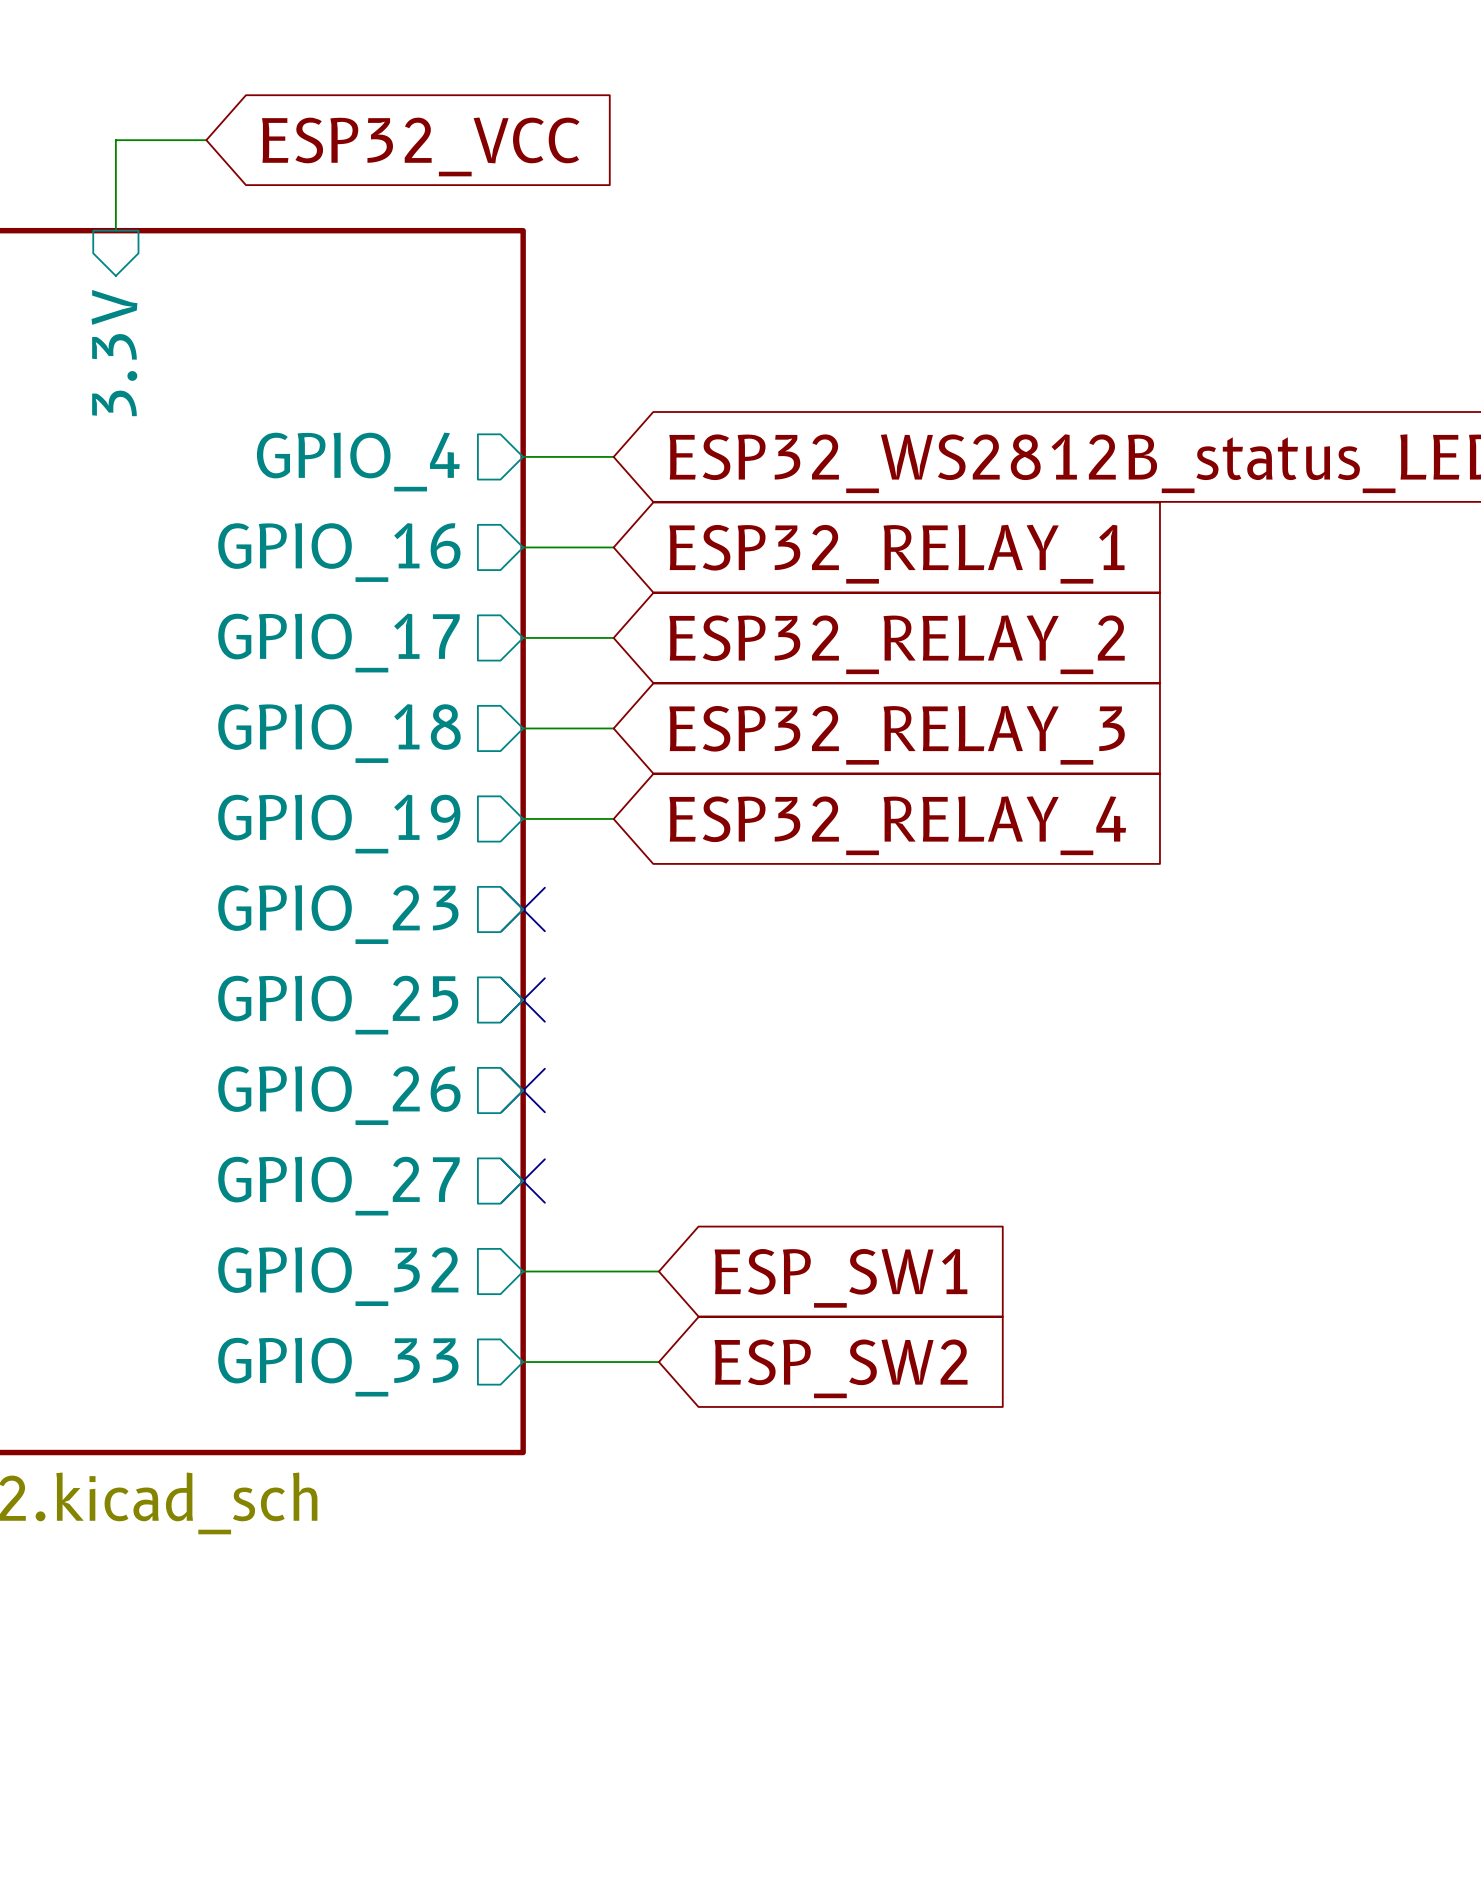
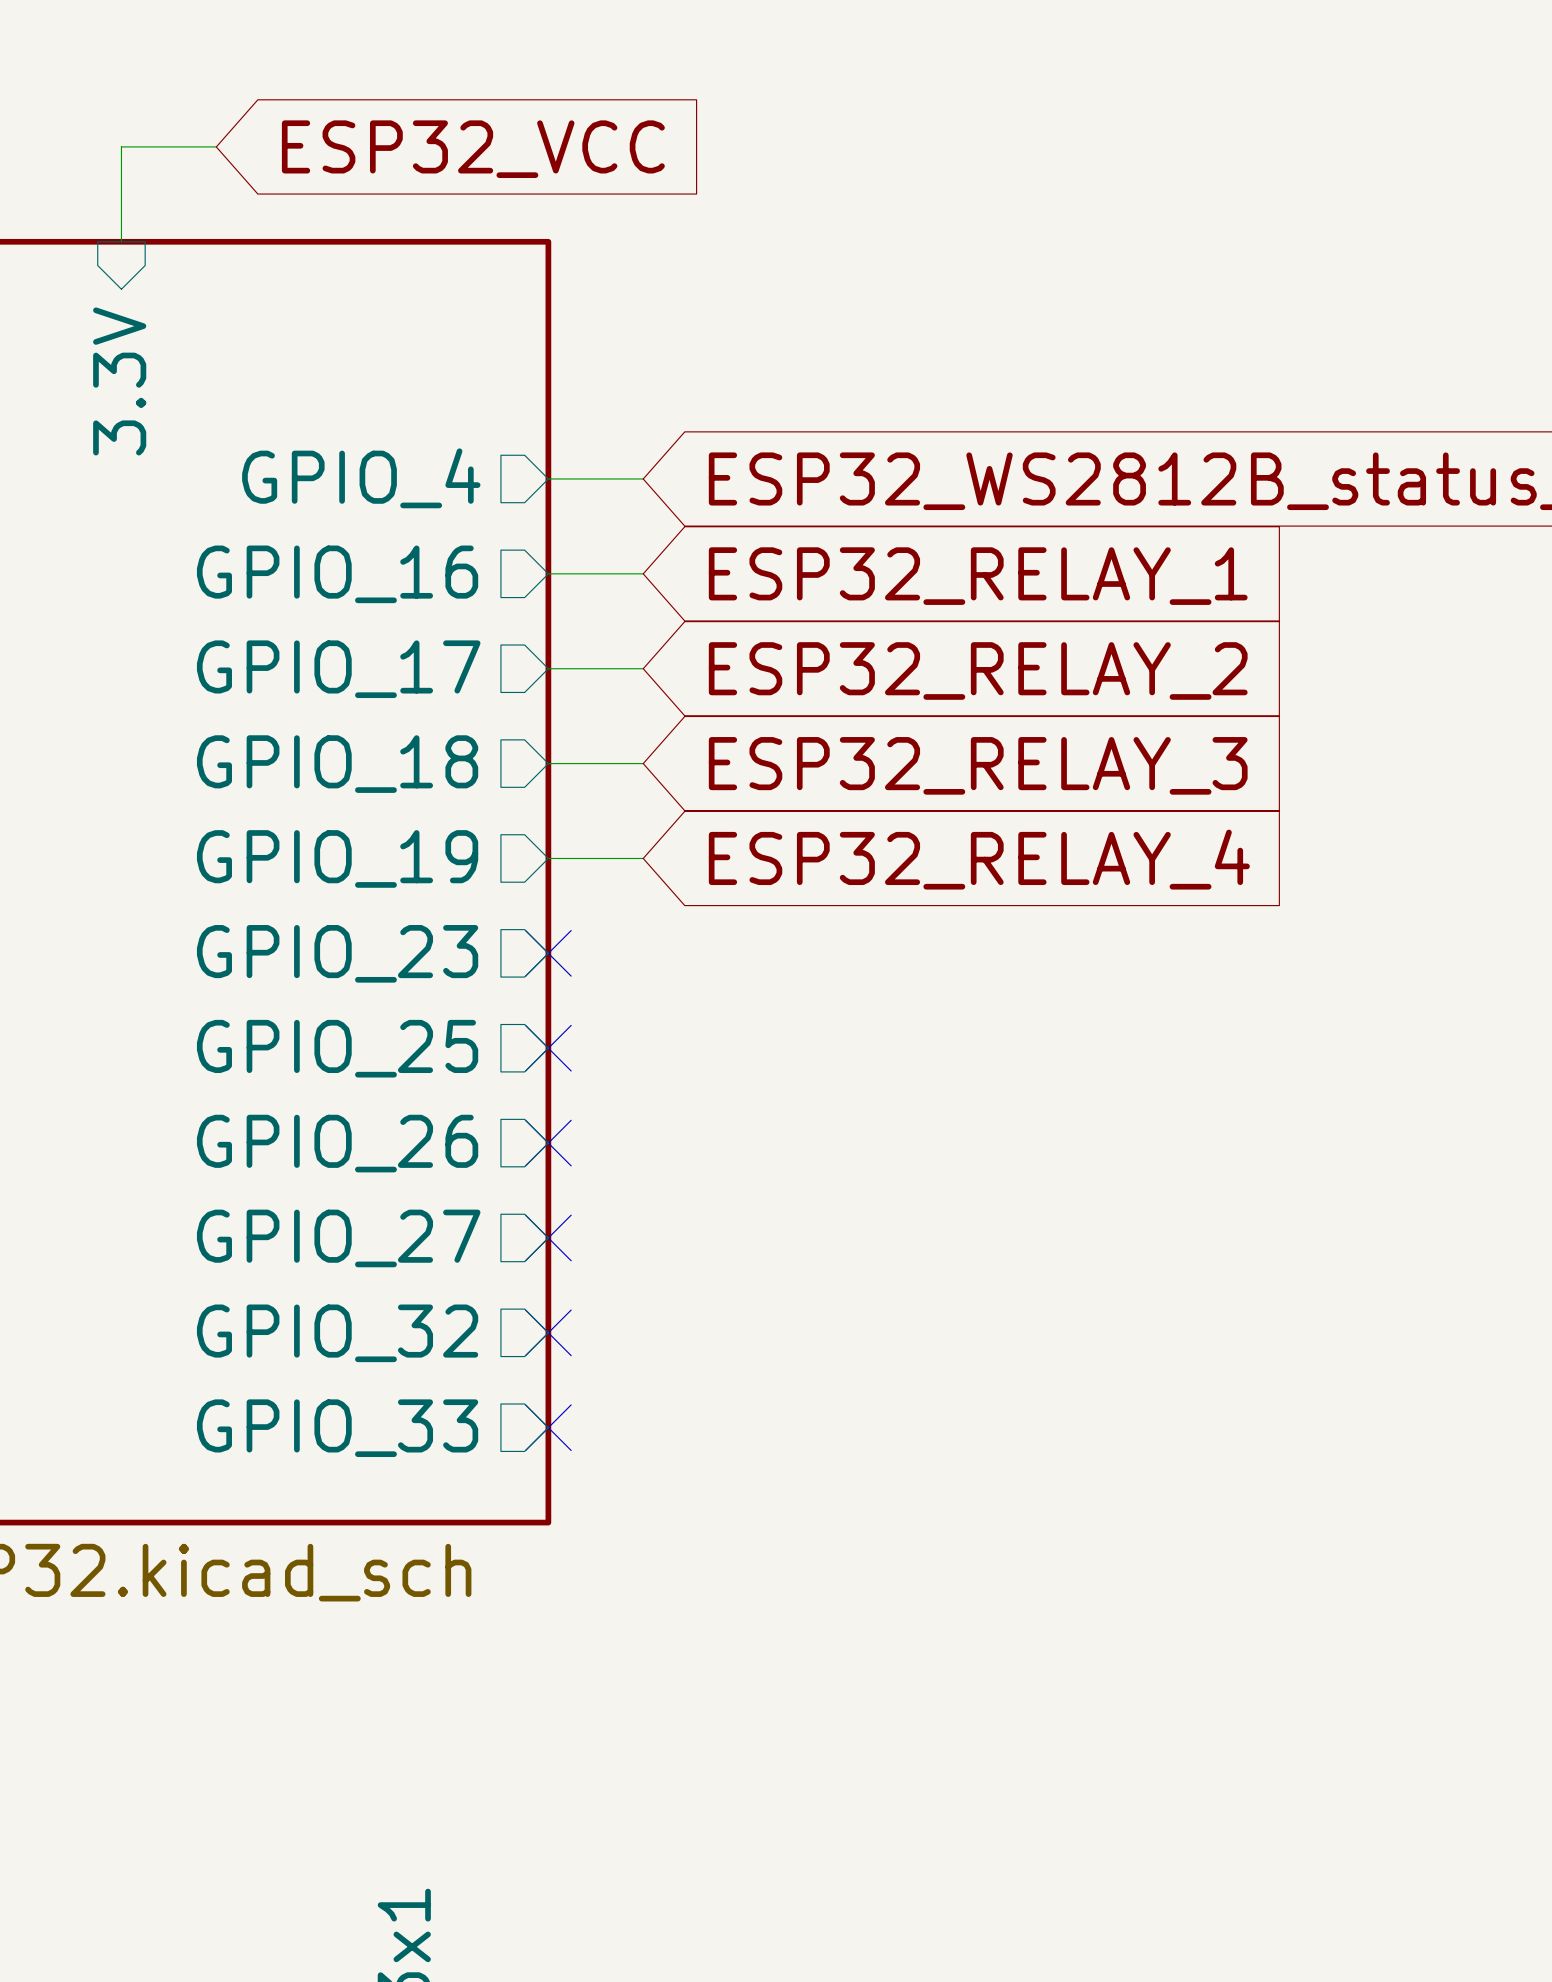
wire: (523, 1271) (658, 1271) -> none
no-connect mark: none -> (548, 1332)
global label: ESP_SW1 (840, 1278) -> none
wire: (523, 1362) (658, 1362) -> none
no-connect mark: none -> (548, 1427)
global label: ESP_SW2 (841, 1368) -> none

